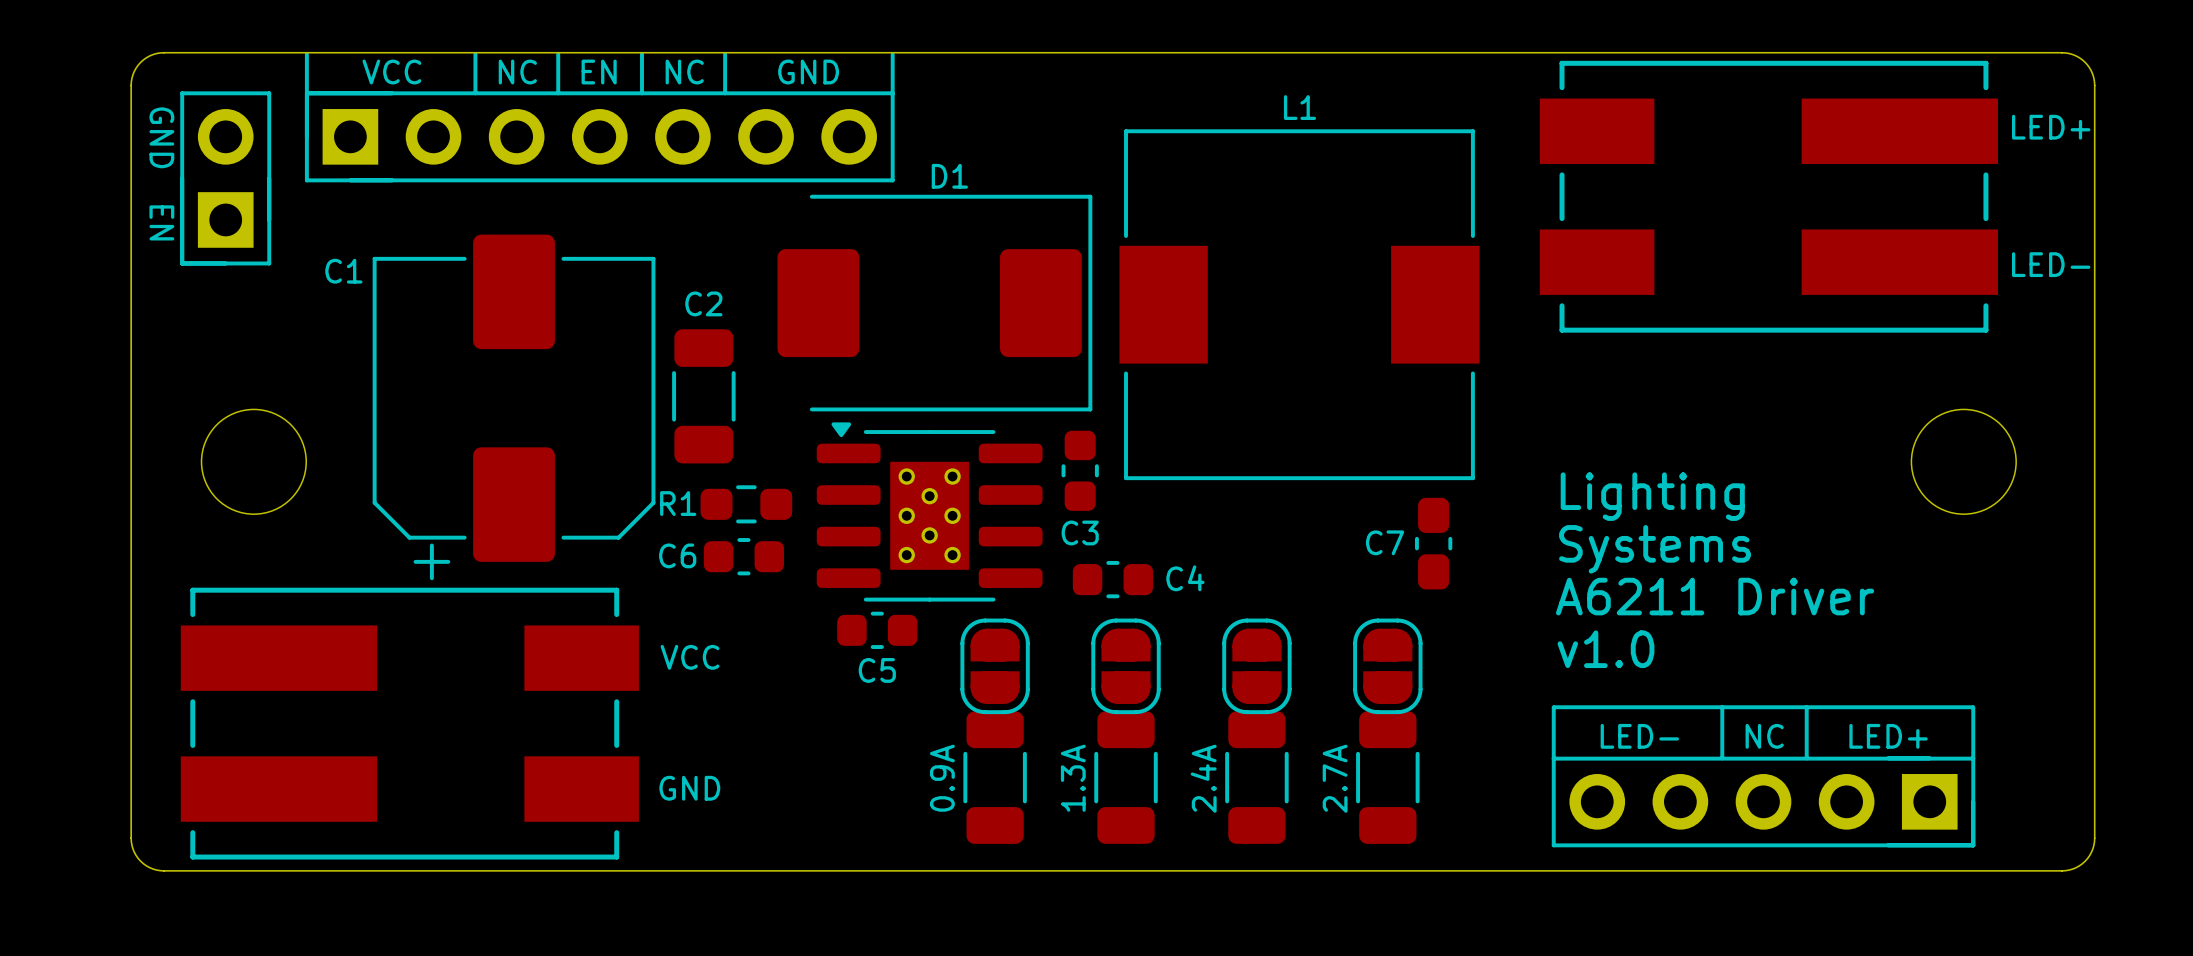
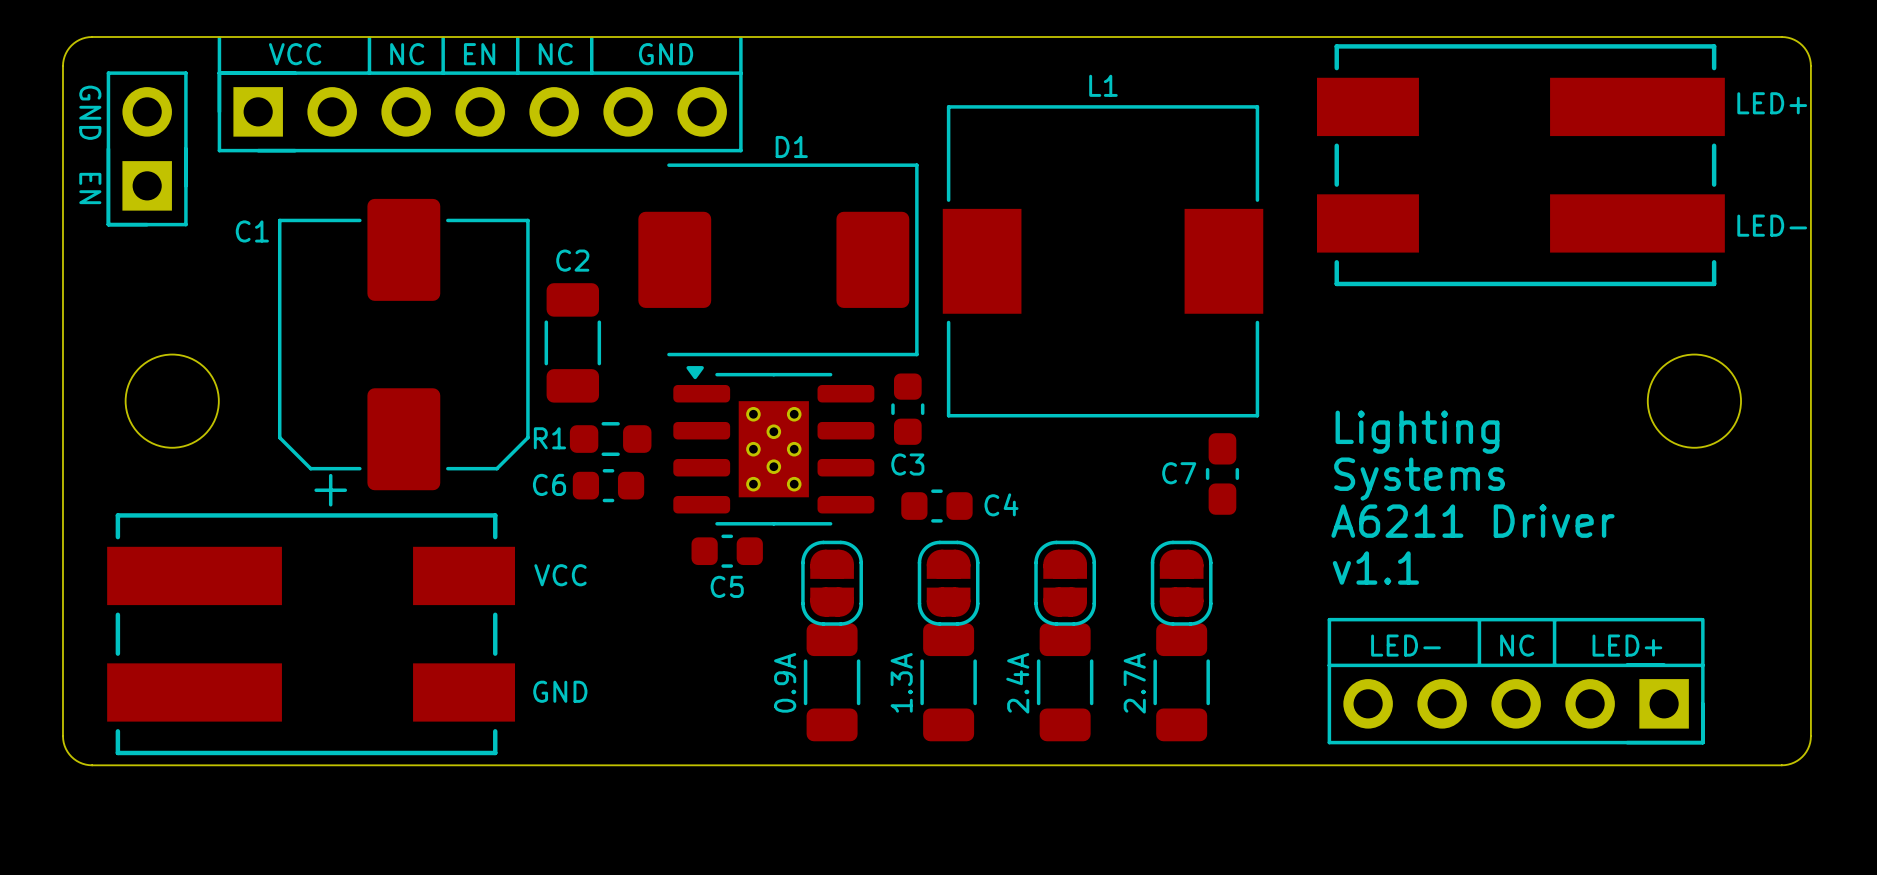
text: v1.0 (1605, 649) -> v1.1 (1375, 568)

